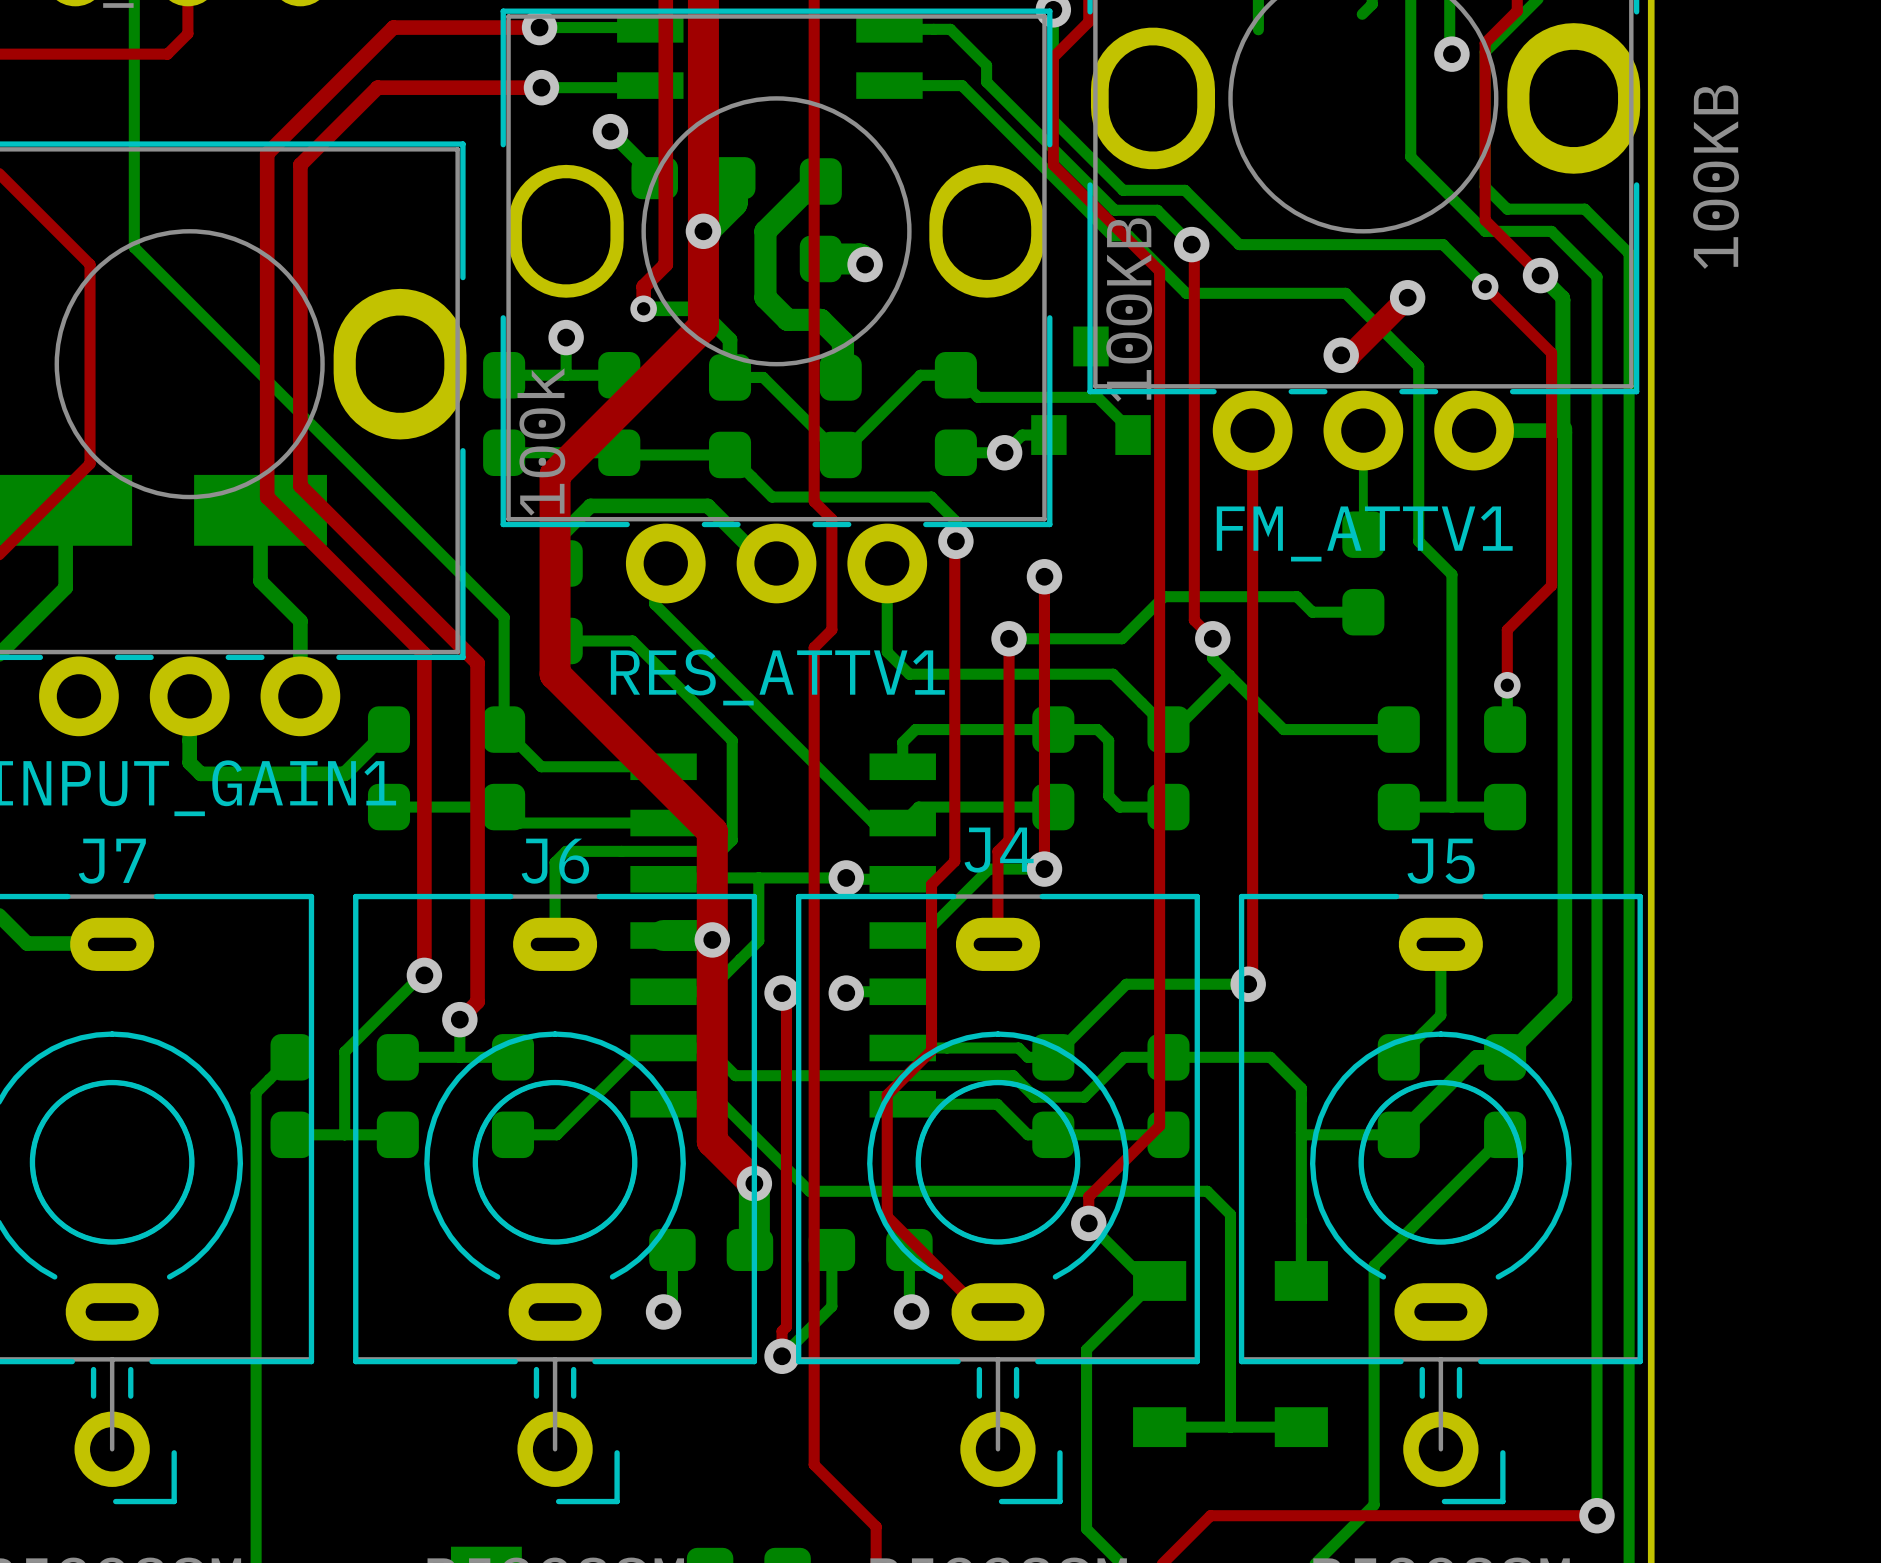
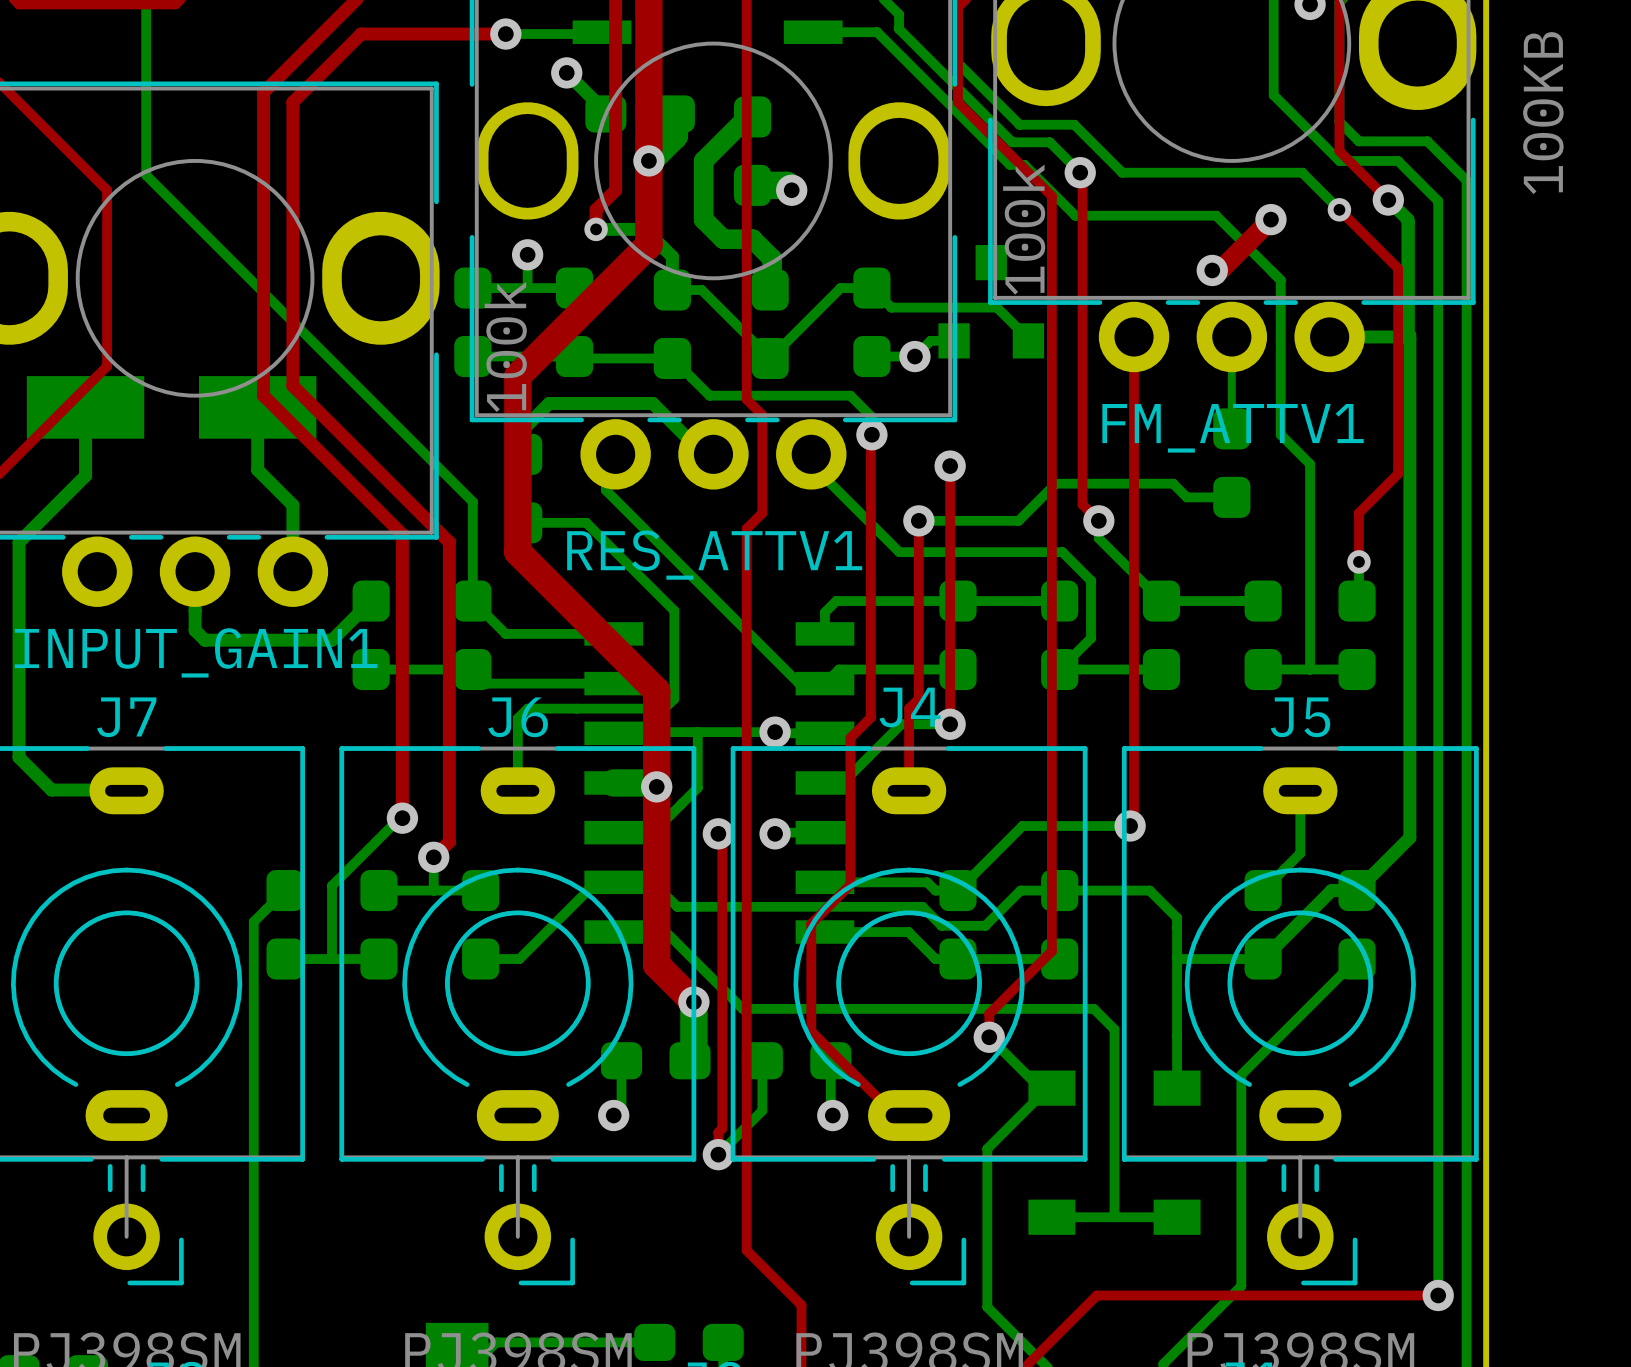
RES_ATTV1 value: 100KB (1129, 310) -> 100k (1024, 229)
bottom track: (887, 563) (887, 652) (909, 674) (986, 674) -> (801, 454) (899, 552)
bottom track: (1113, 674) (1168, 729) (1175, 729) (1229, 675) -> (1010, 552) (1062, 552) (1091, 580) (1091, 638) (1059, 669) (1161, 669)
bottom track: (1097, 729) (1108, 740) (1108, 796) (1119, 807) (1168, 807) -> (997, 601) (1059, 601)
part: none -> (1161, 635)

